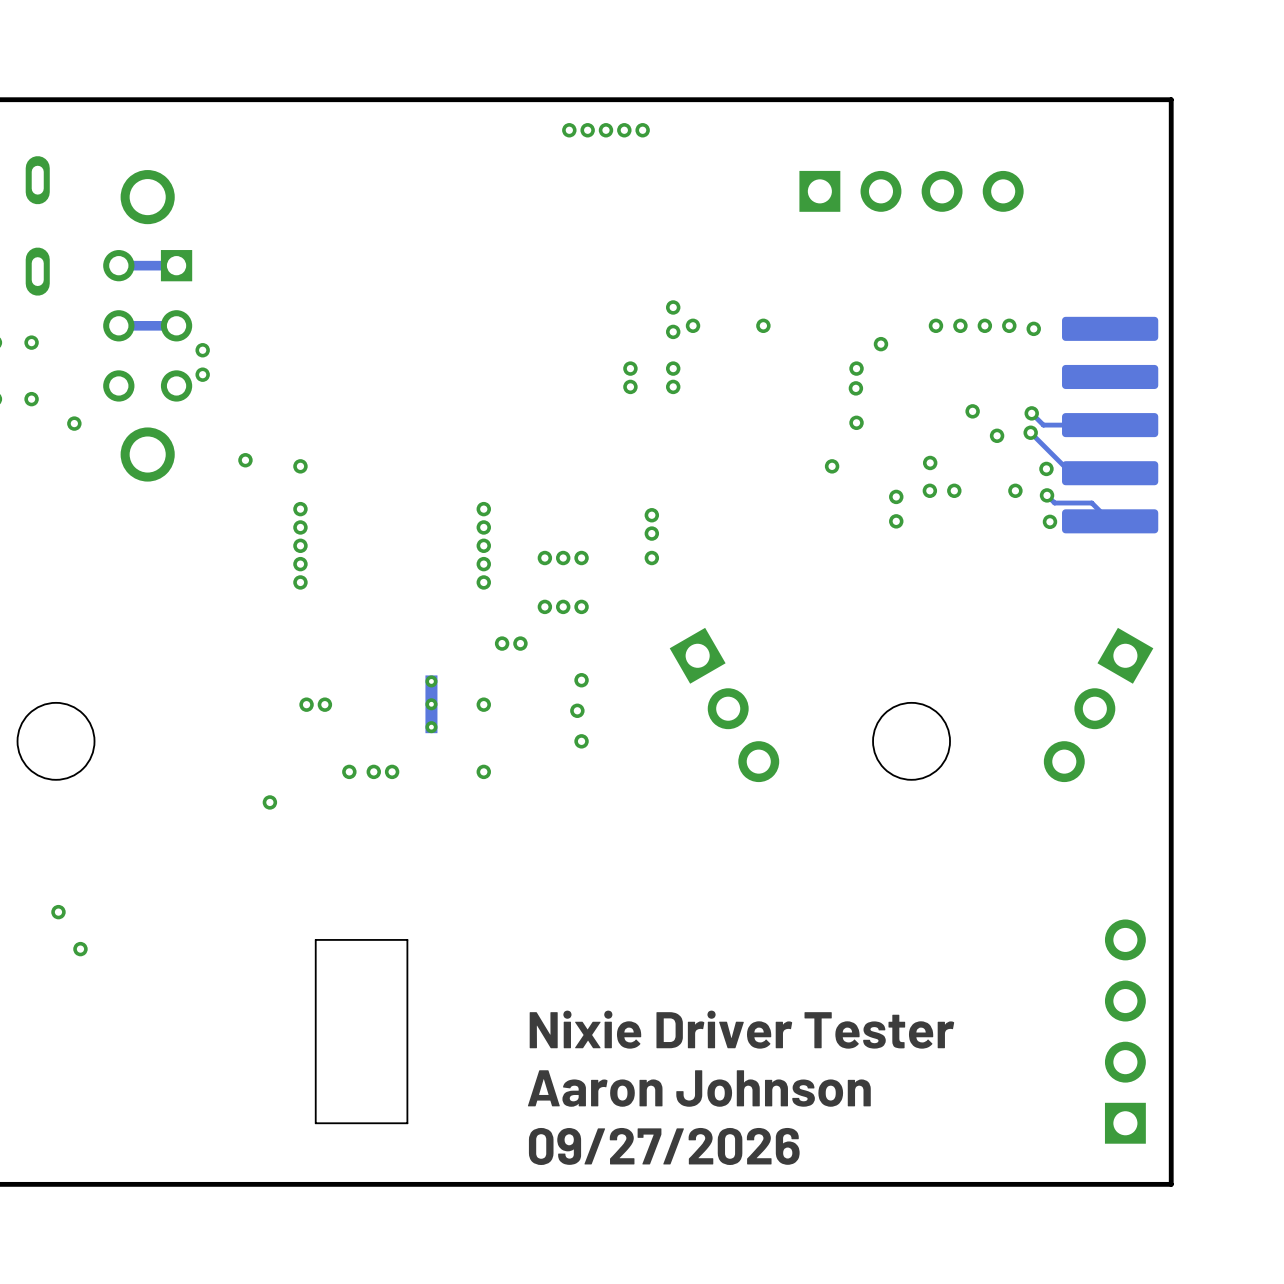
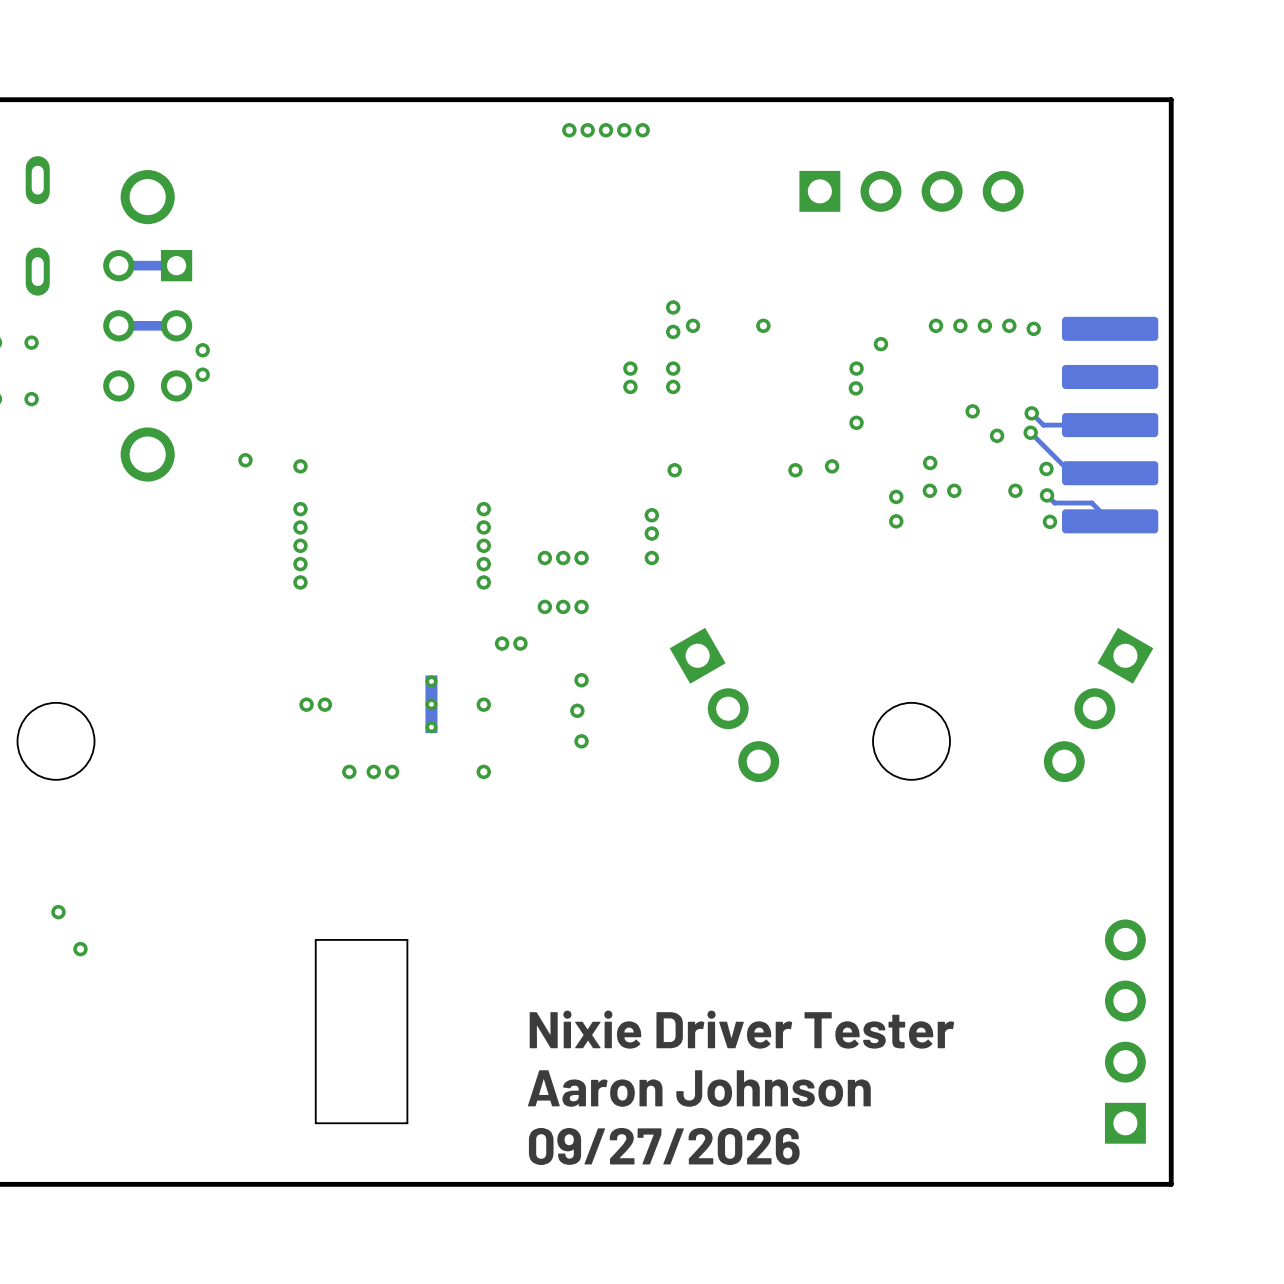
via: (74, 423) -> none
via: none -> (674, 470)
via: none -> (795, 470)
via: (269, 802) -> none

